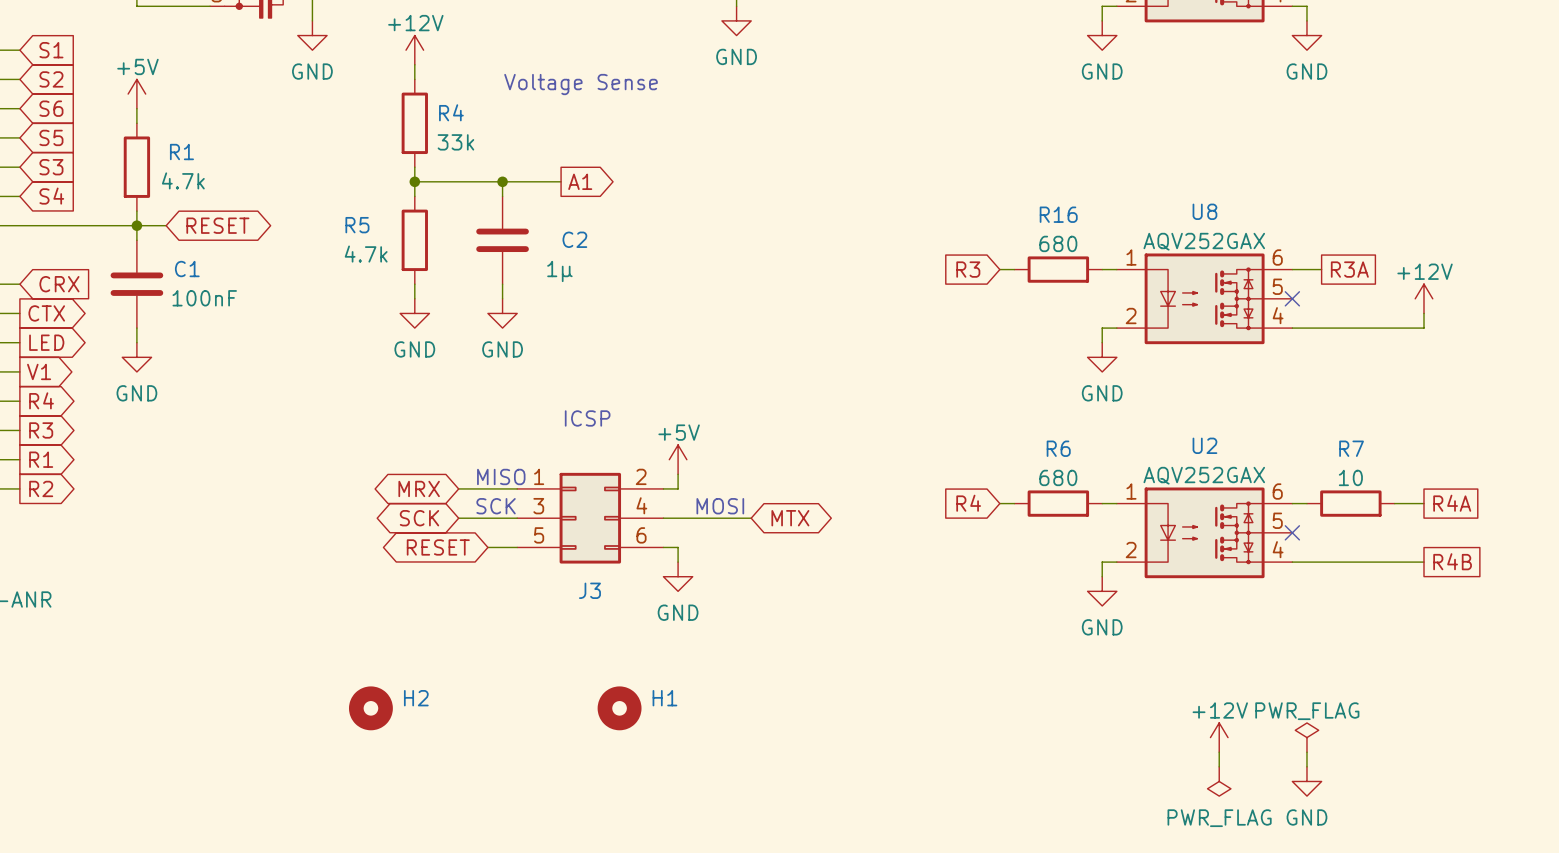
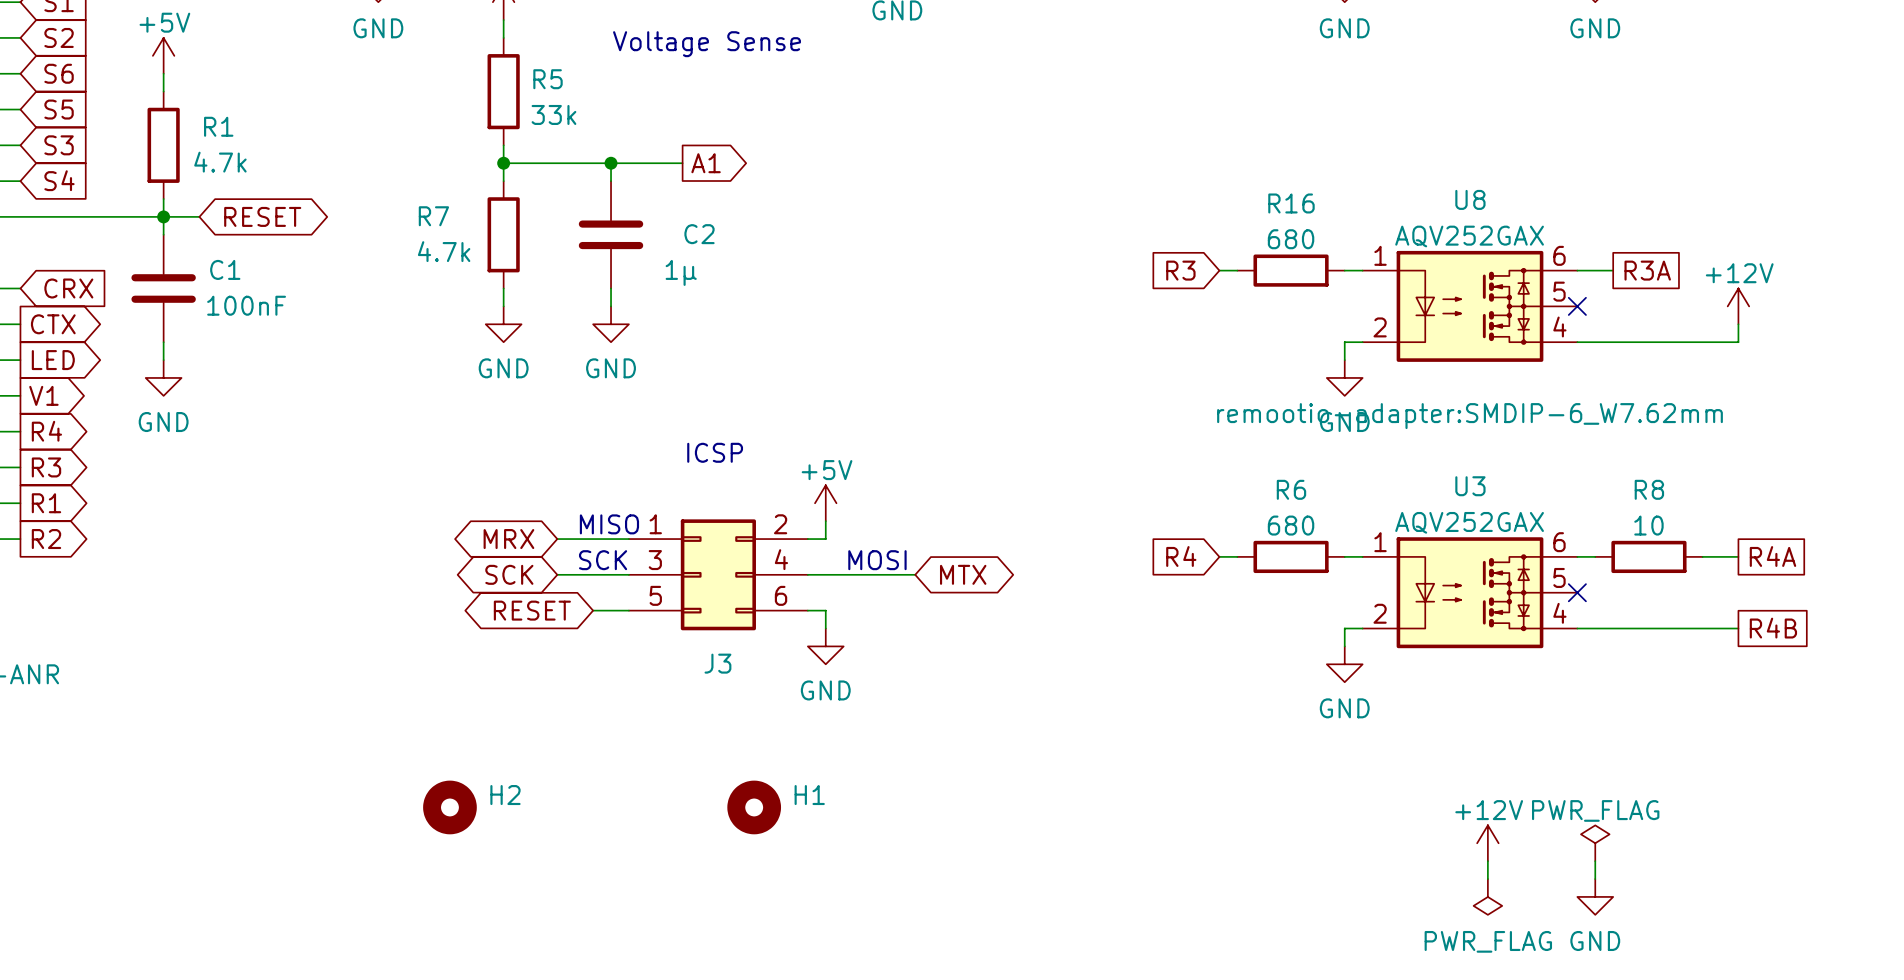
R4 name: R4 (451, 112) -> R5 (548, 79)
R5 name: R5 (357, 225) -> R7 (433, 216)
U8 text: none -> remootio-adapter:SMDIP-6_W7.62mm (1470, 416)
U2 name: U2 (1204, 445) -> U3 (1470, 486)
R7 name: R7 (1351, 448) -> R8 (1649, 489)

